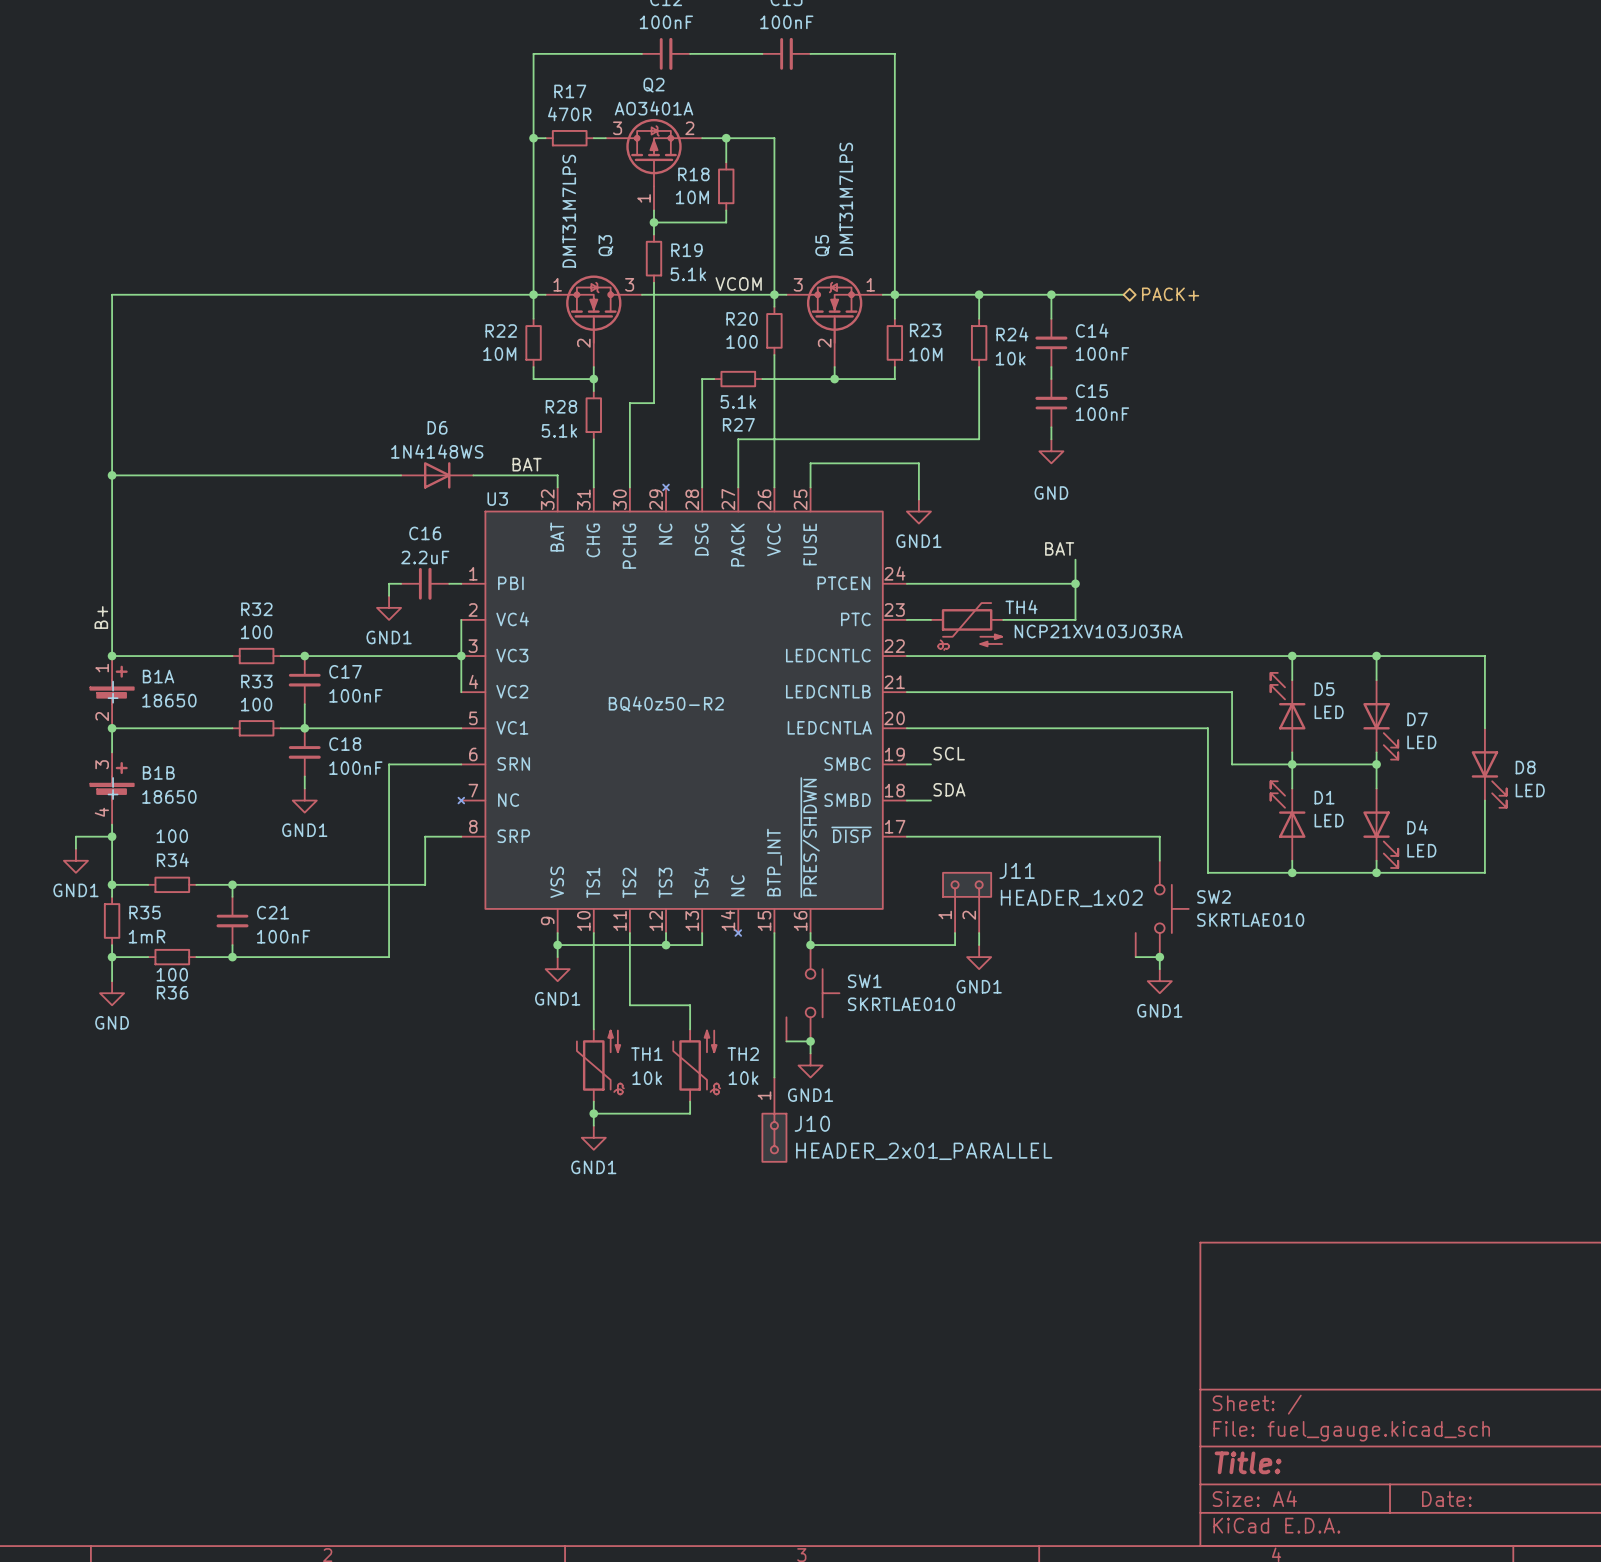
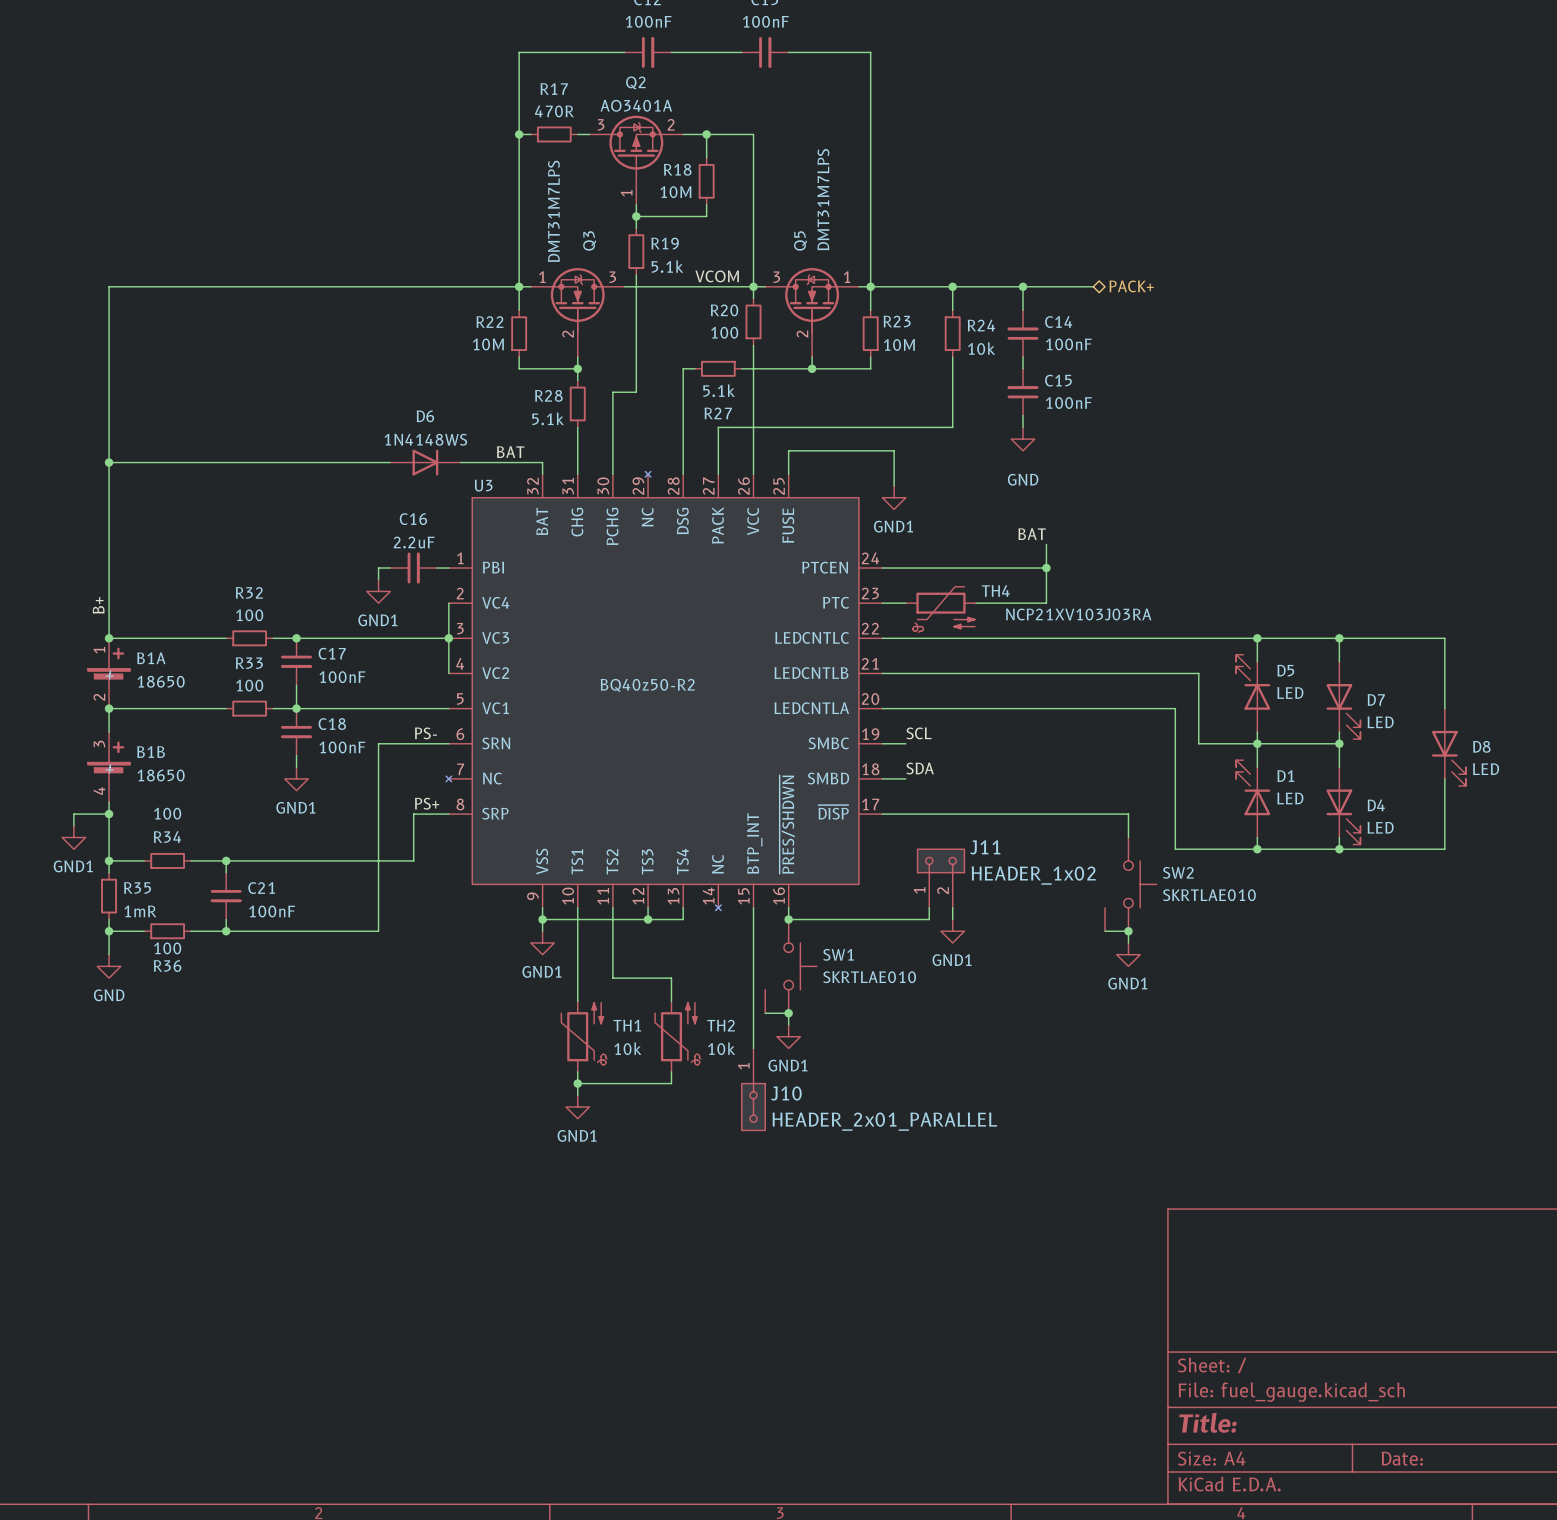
label: none -> PS- (425, 733)
label: none -> PS+ (427, 803)

